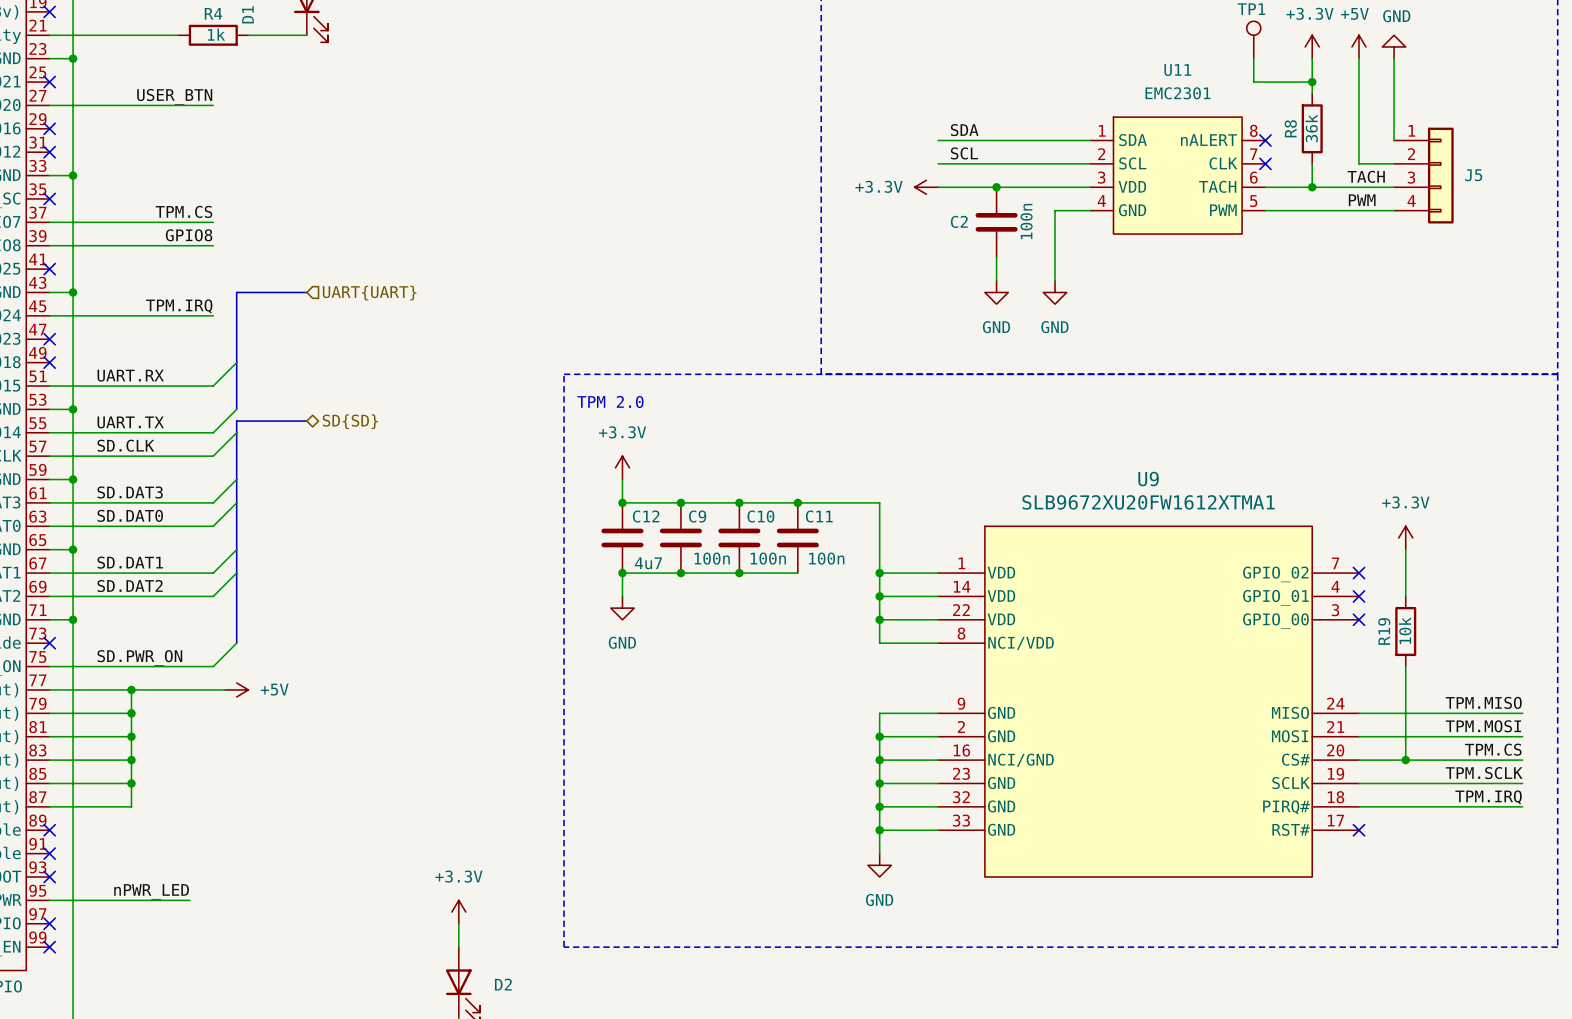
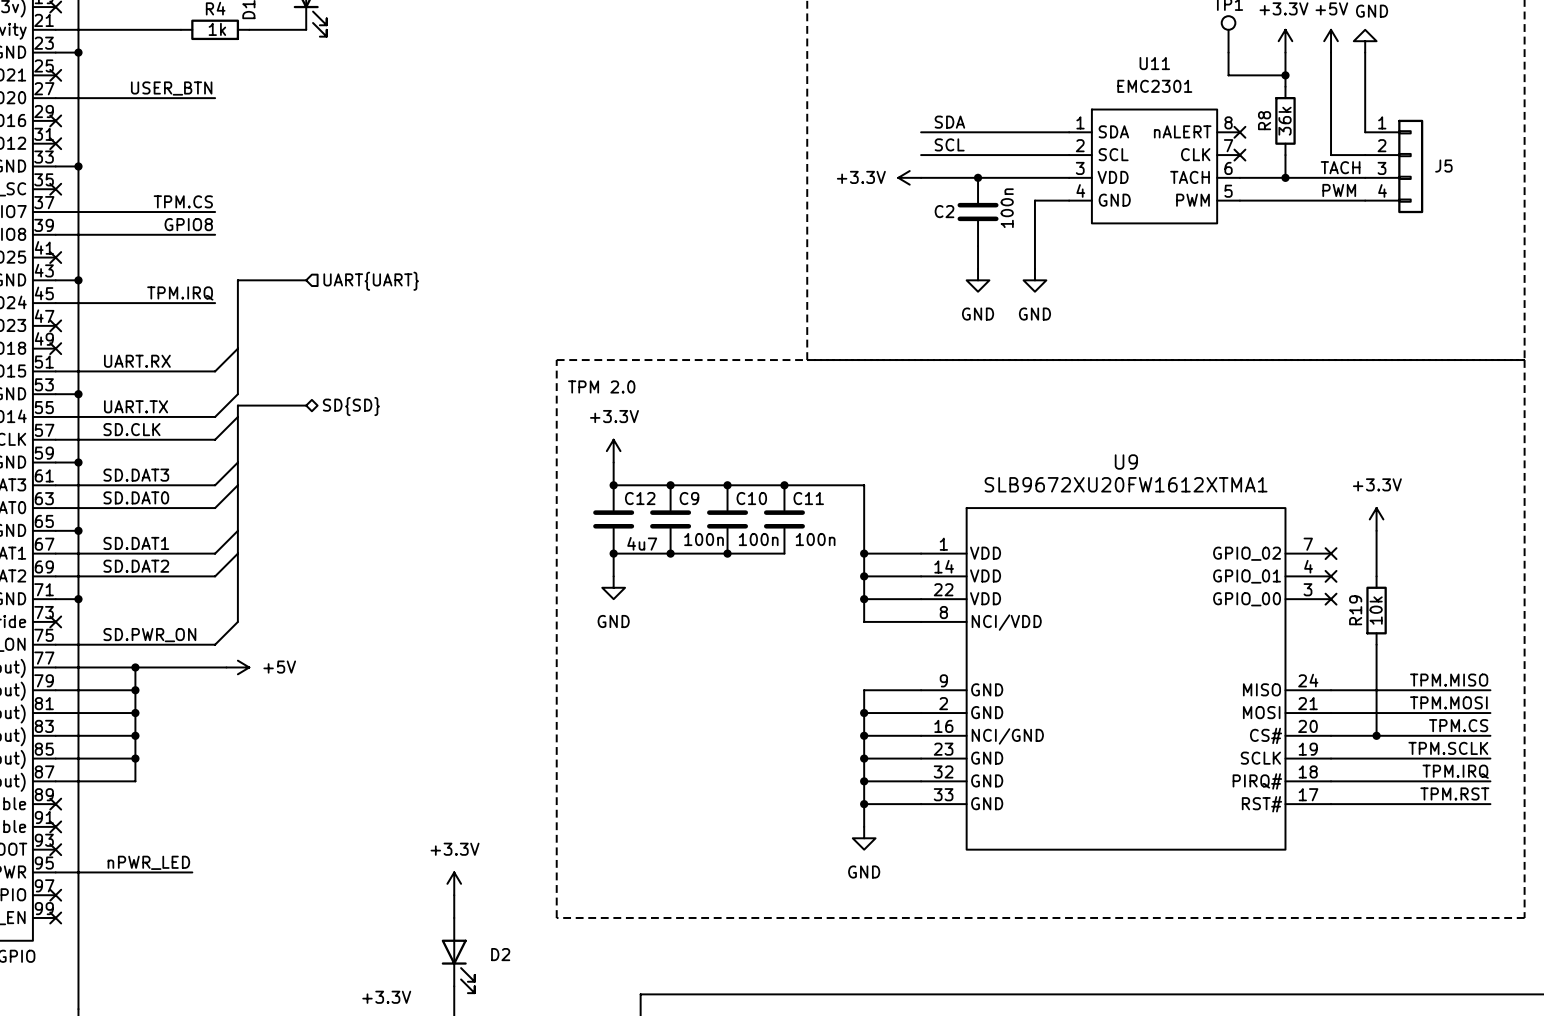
label: none -> TPM.RST (1454, 793)
wire: none -> (1331, 804) (1490, 804)
no-connect mark: (1358, 830) -> none

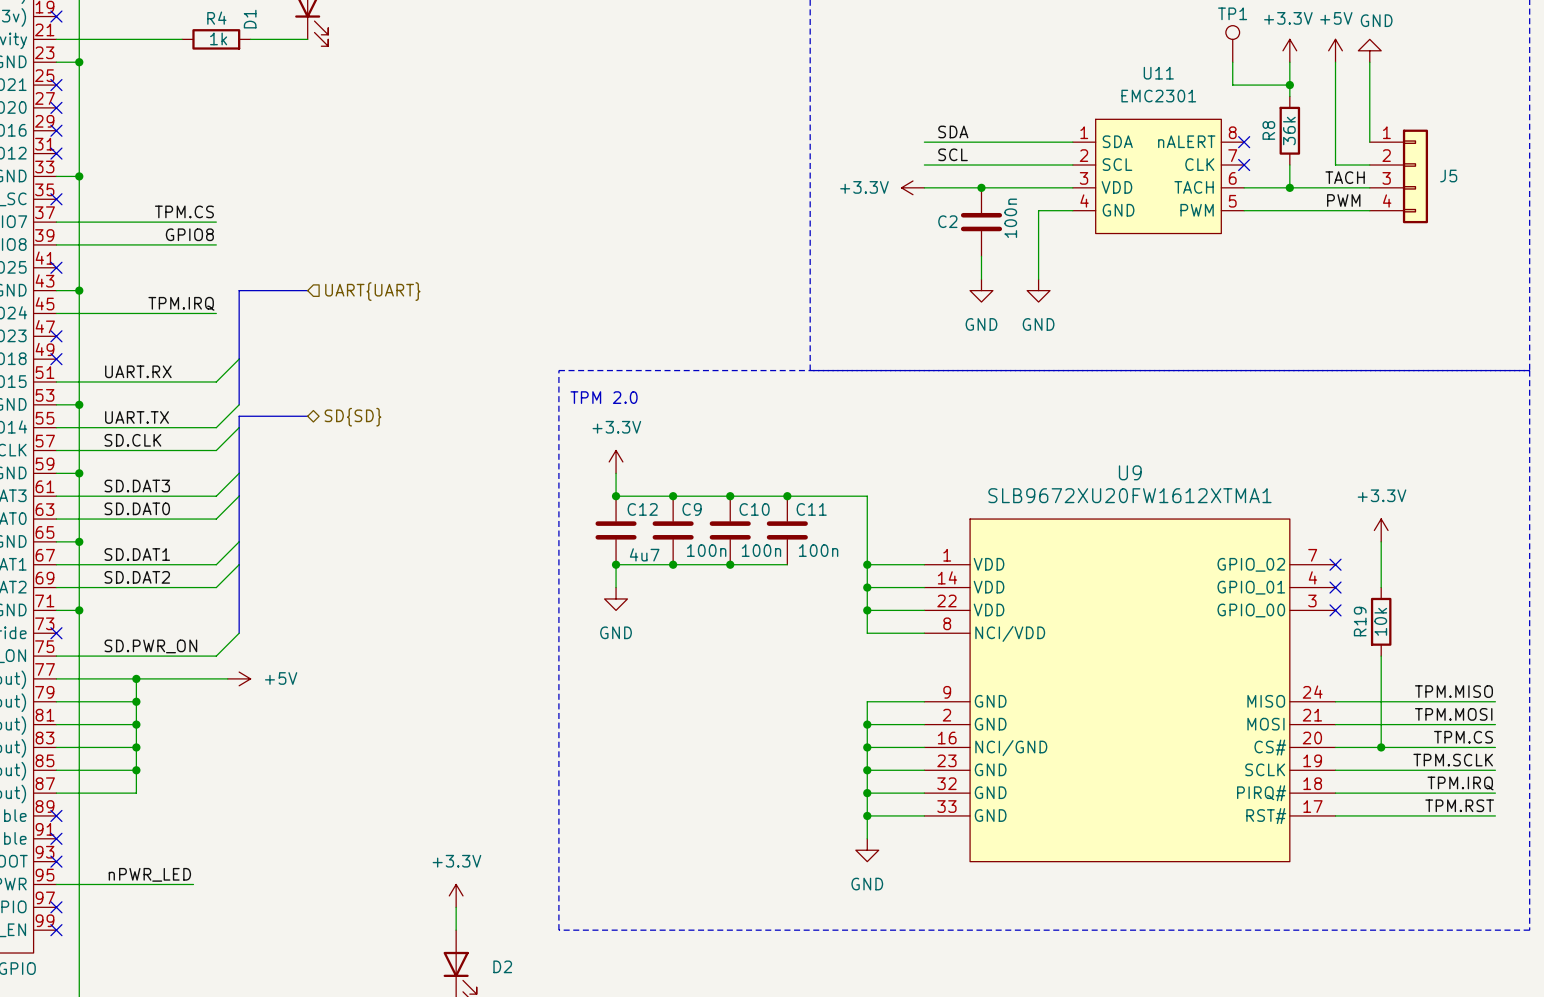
label: USER_BTN (171, 88) -> none
wire: (55, 98) (215, 98) -> none
no-connect mark: none -> (56, 107)

